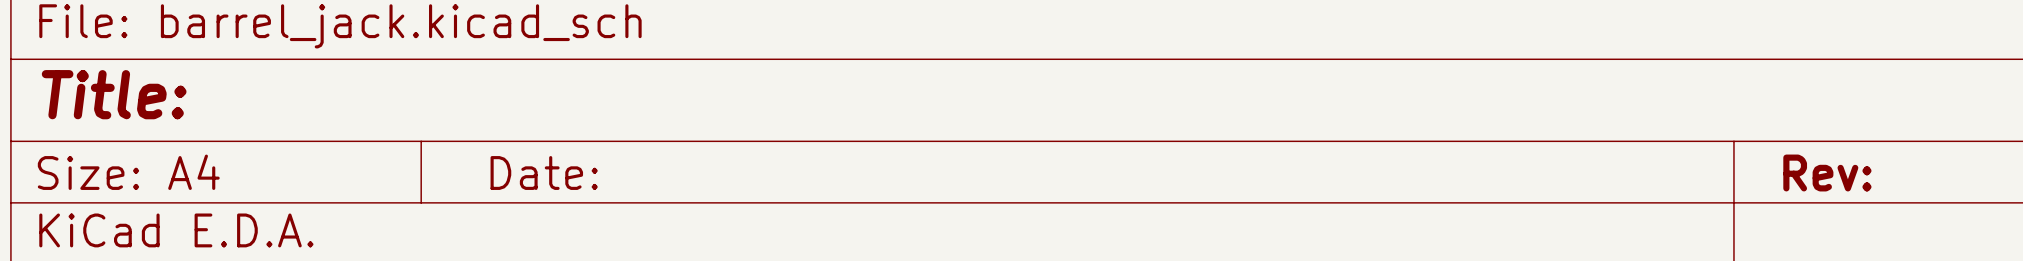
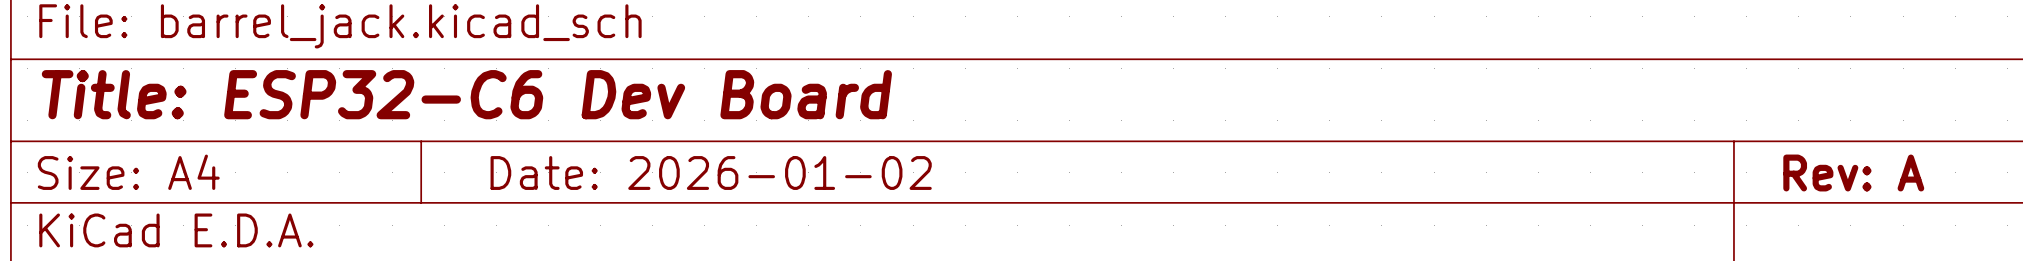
title block: Title: (114, 94) -> Title: ESP32-C6 Dev Board (466, 94)
title block: Date: (544, 173) -> Date: 2026-01-02 (711, 173)
title block: Rev: (1827, 173) -> Rev: A (1853, 173)

